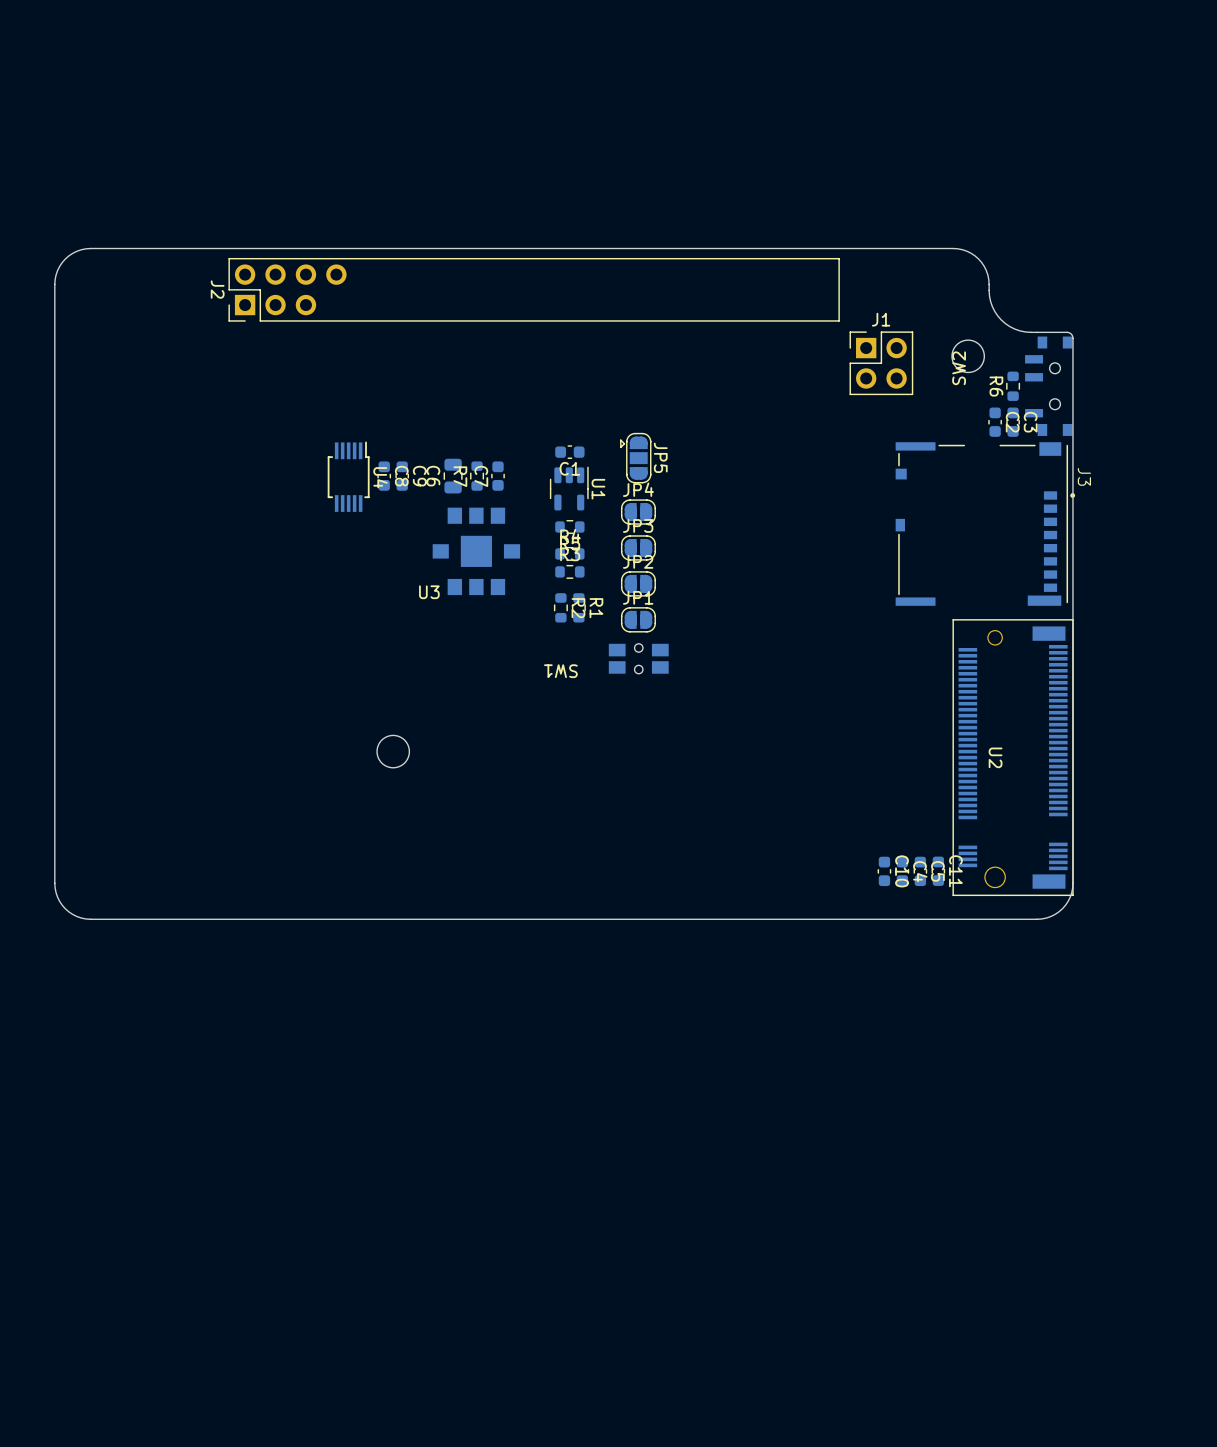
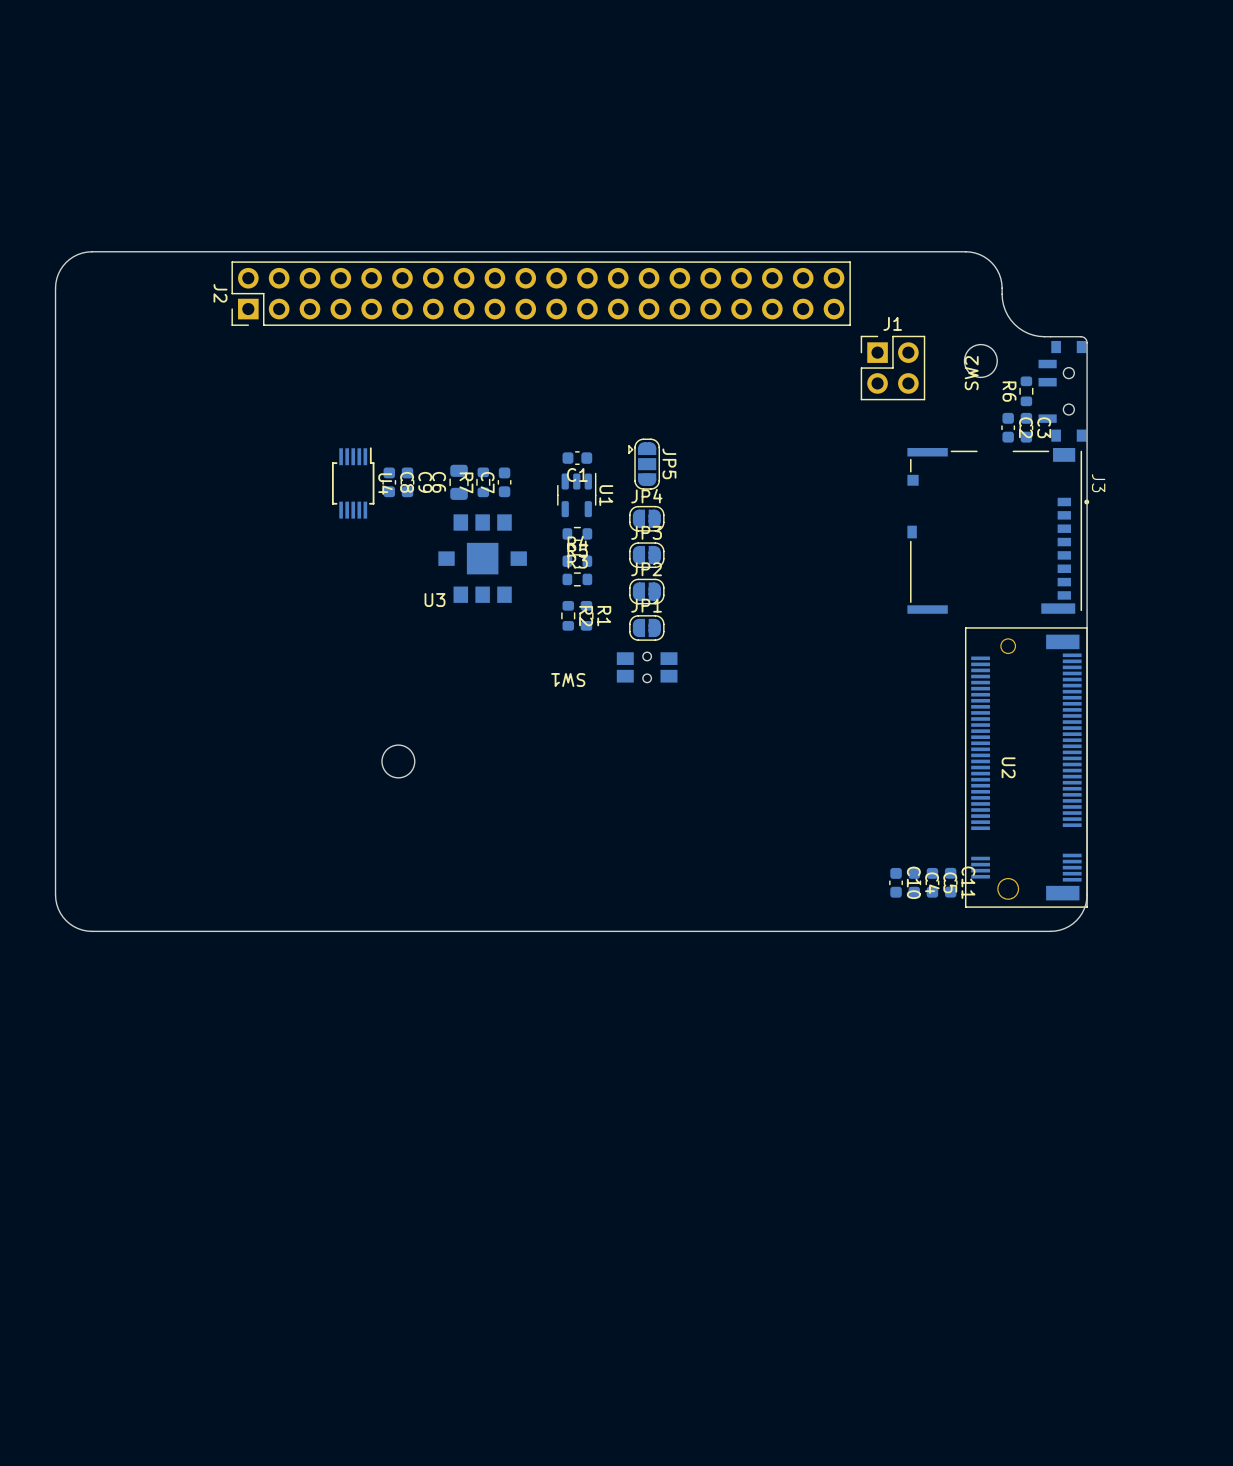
J2 footprint: [228, 257, 840, 322] -> [231, 261, 851, 326]

